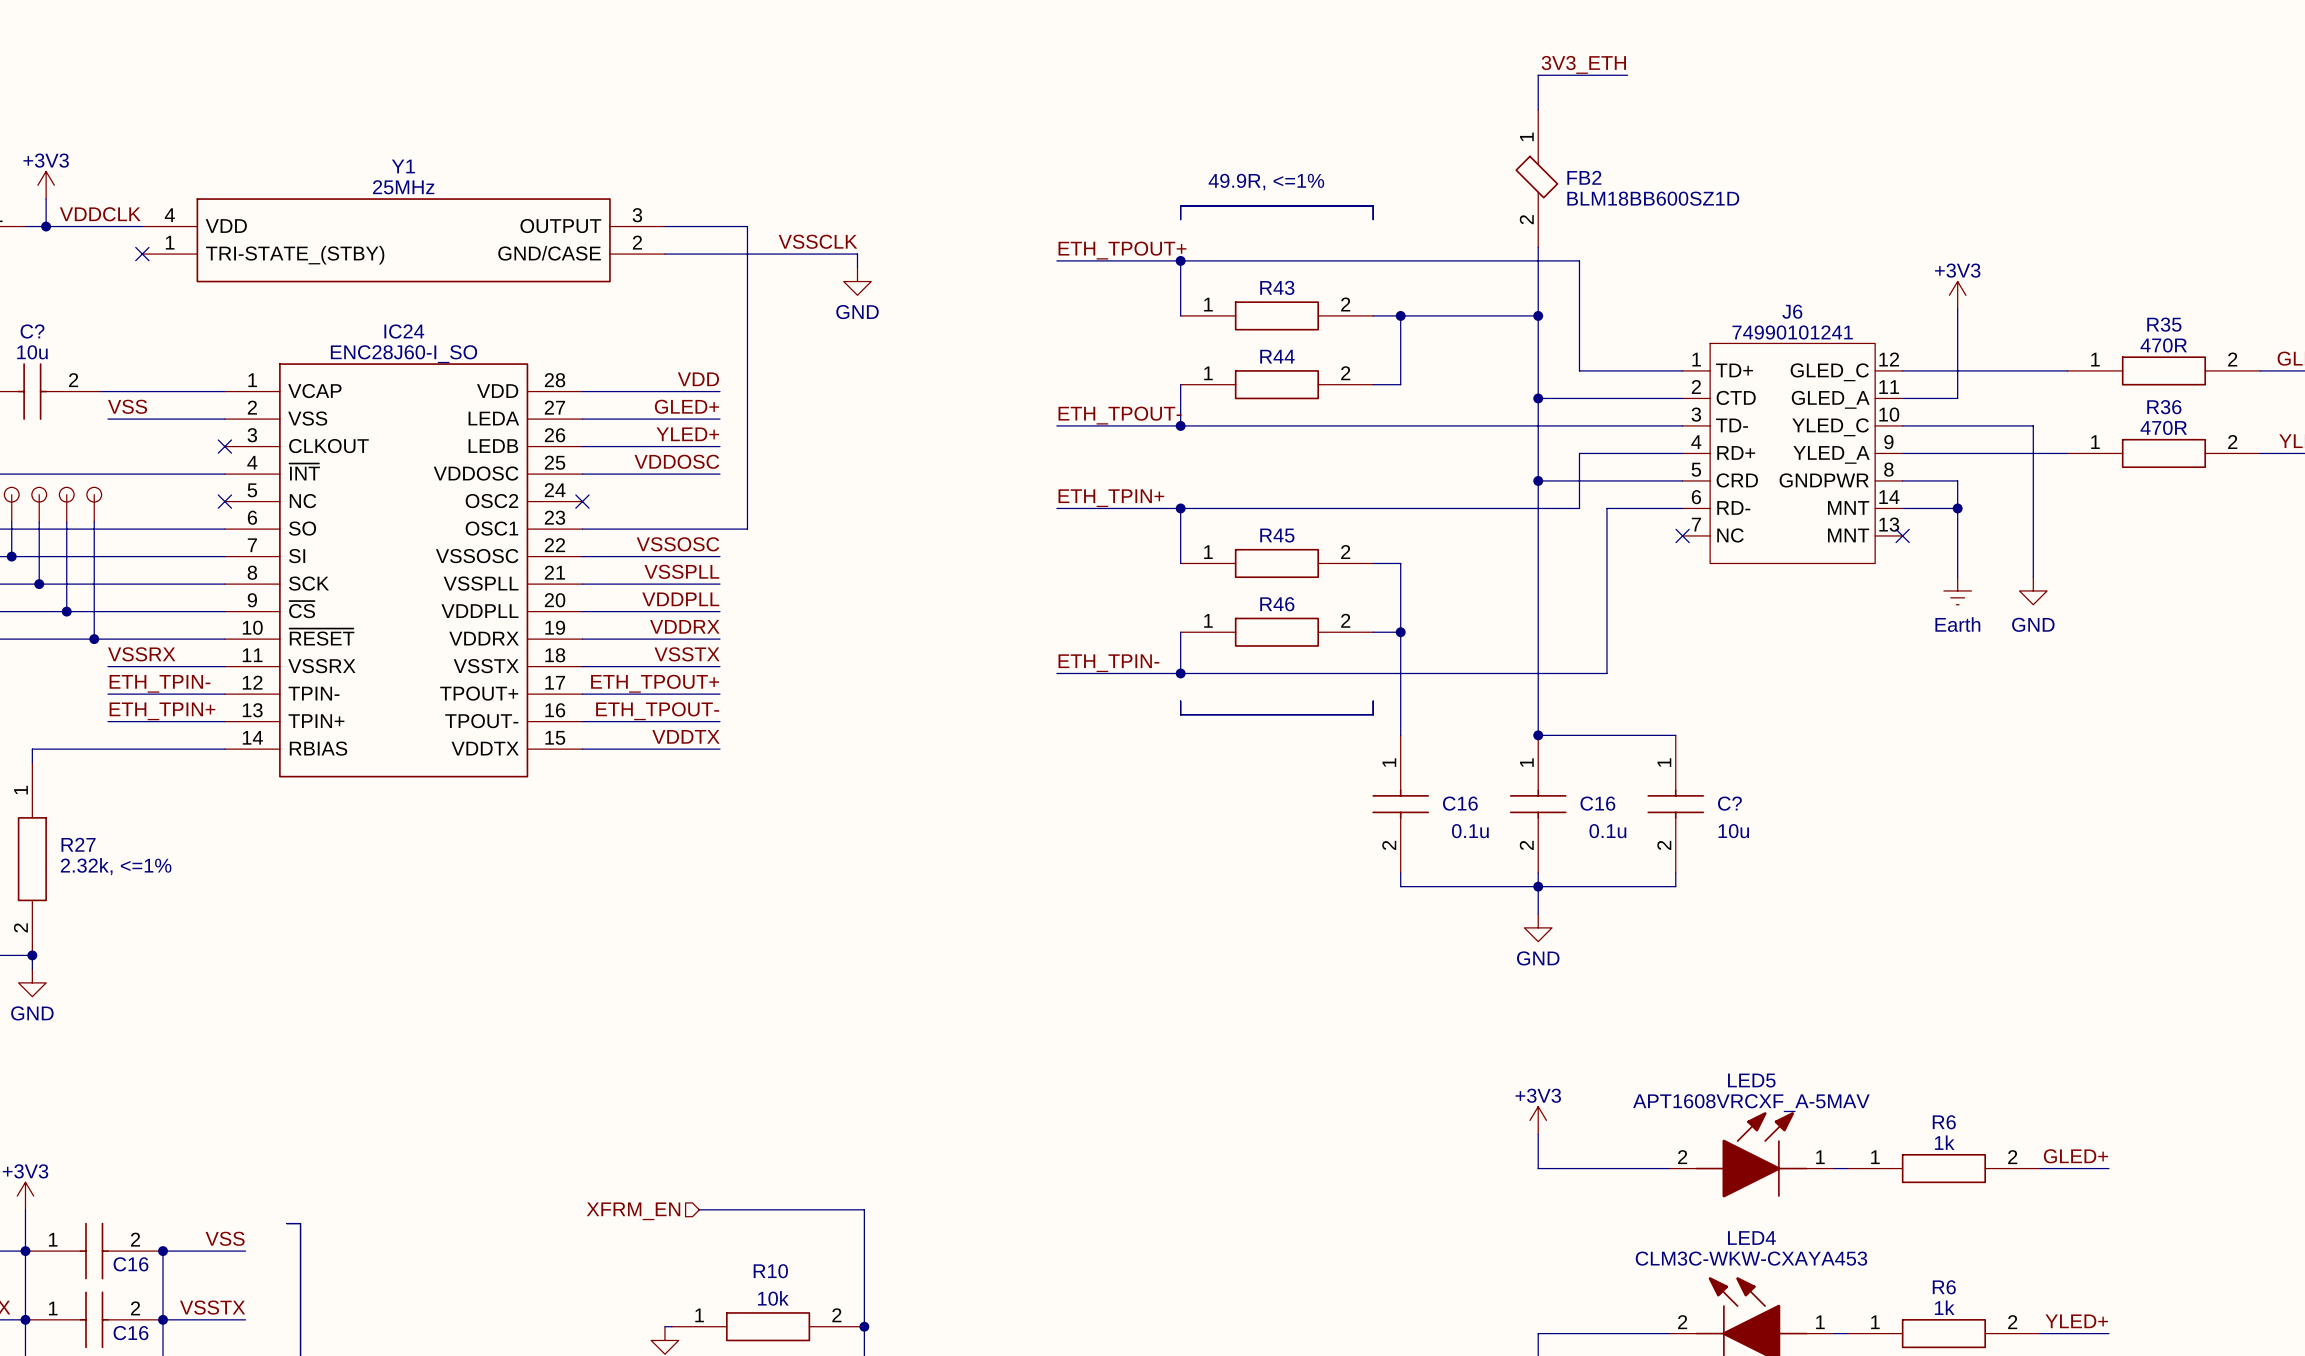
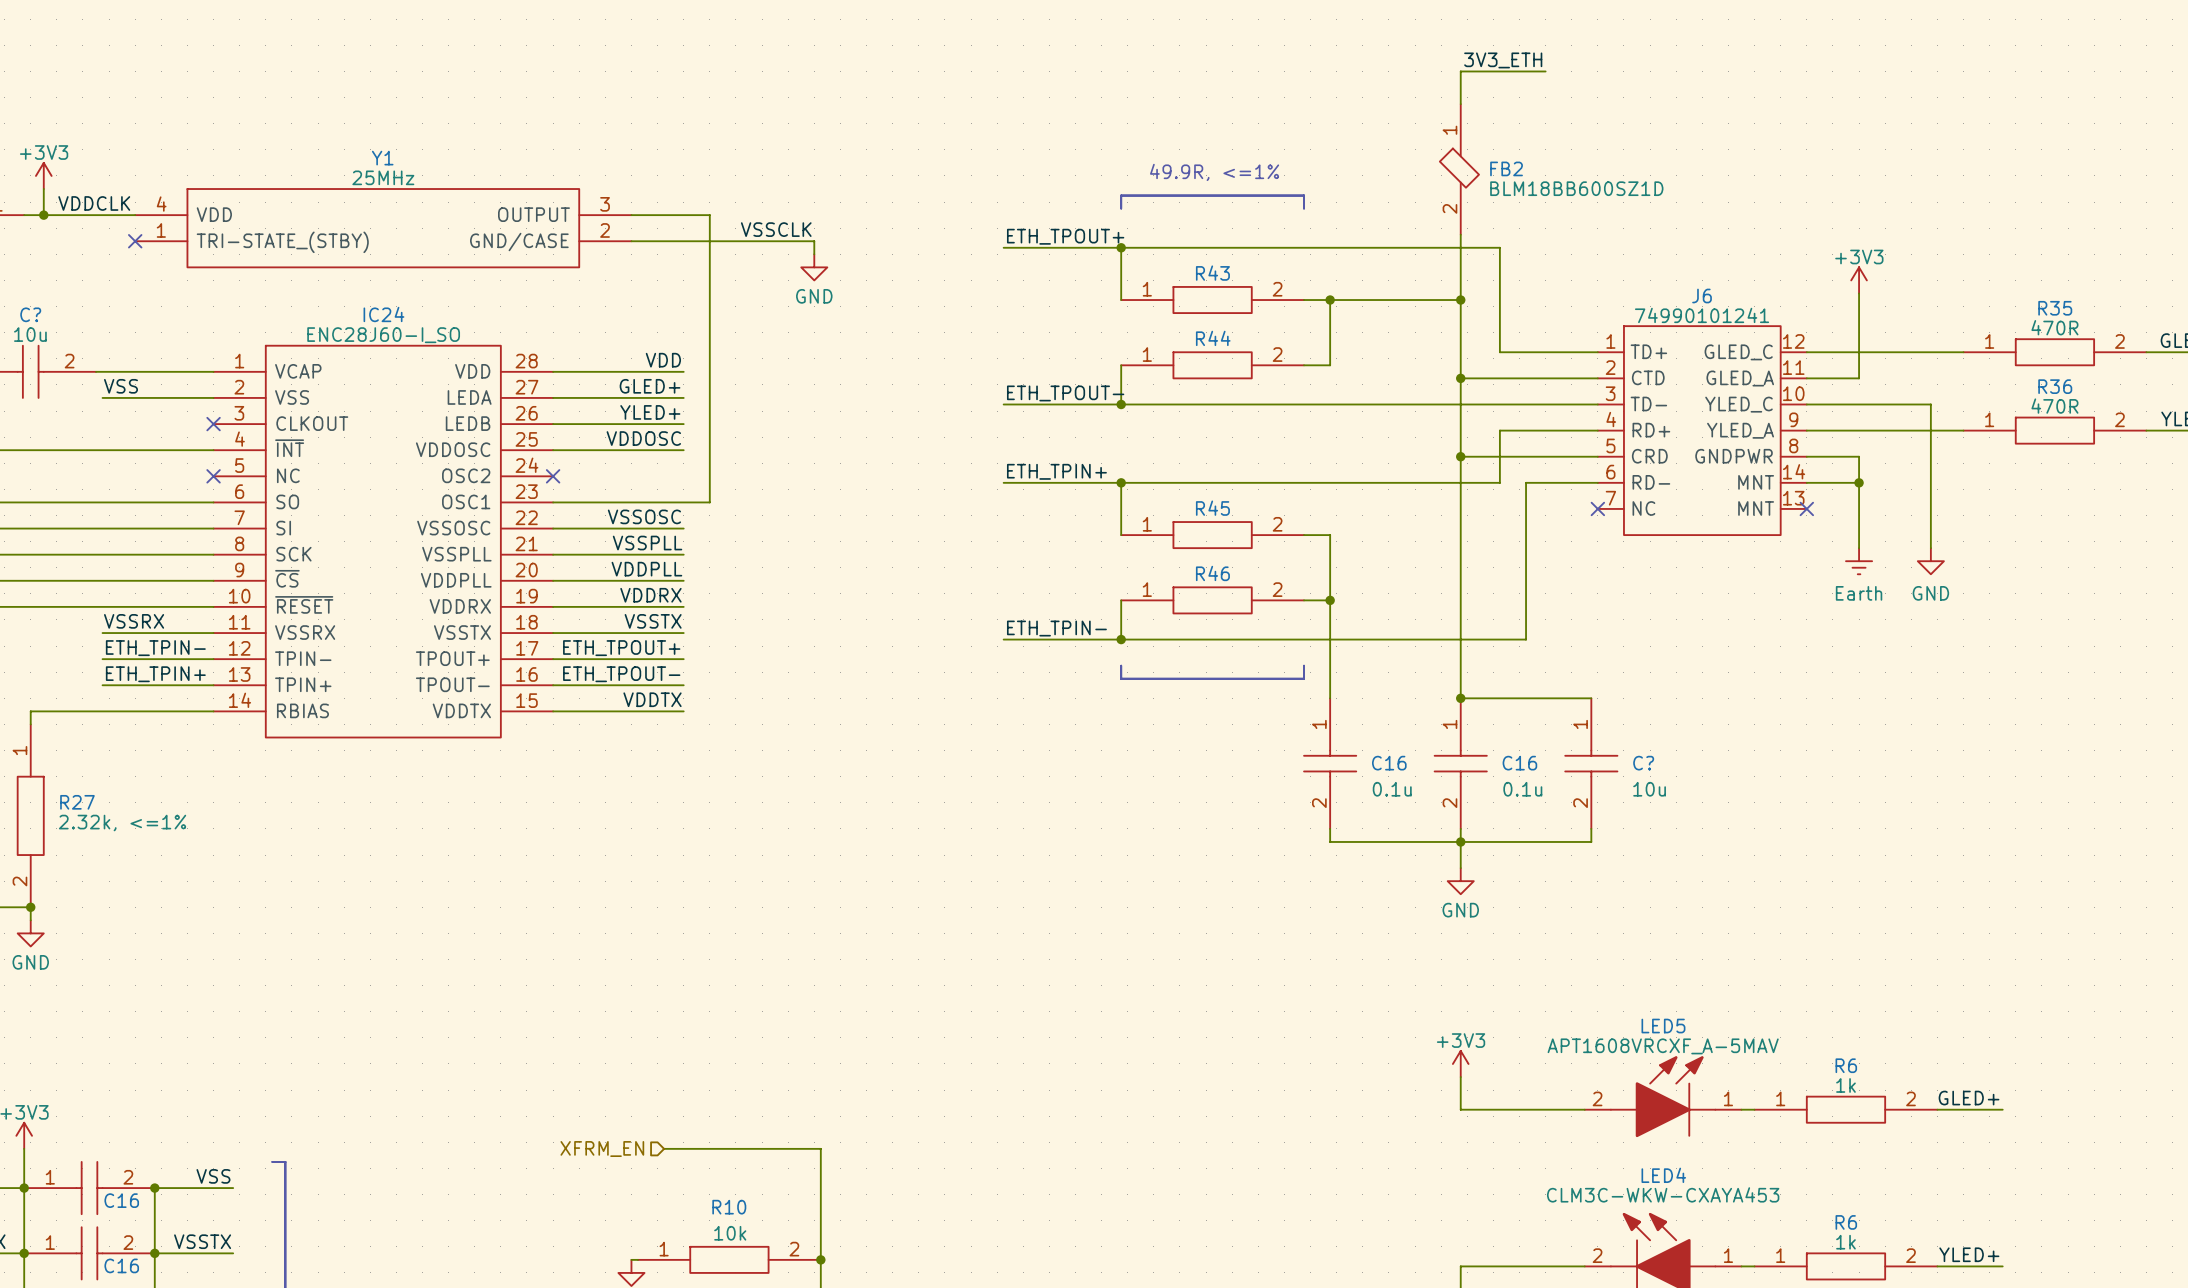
part: (11, 504) -> none
part: (39, 504) -> none
part: (66, 504) -> none
part: (94, 504) -> none
wire: (11, 522) (11, 556) -> none
wire: (39, 522) (39, 584) -> none
wire: (66, 522) (66, 611) -> none
wire: (94, 522) (94, 639) -> none
junction: (11, 556) -> none
junction: (39, 584) -> none
junction: (66, 611) -> none
junction: (94, 639) -> none

